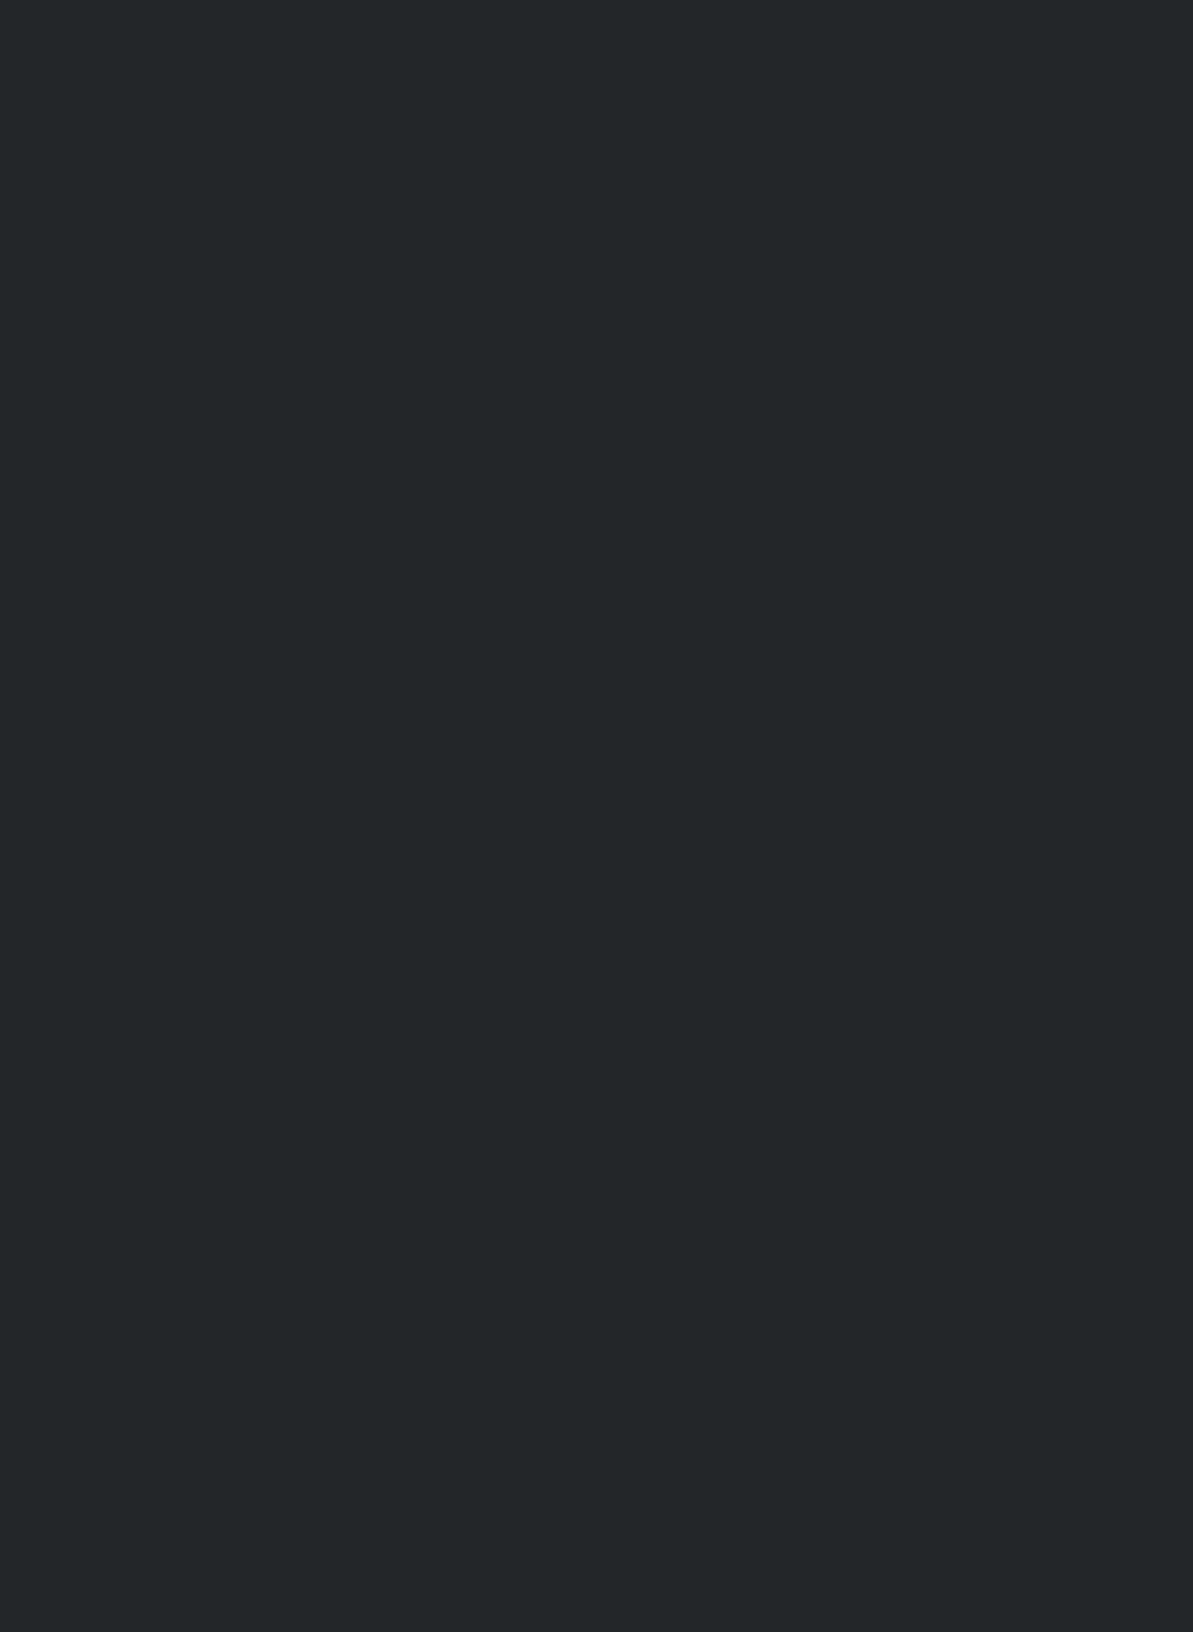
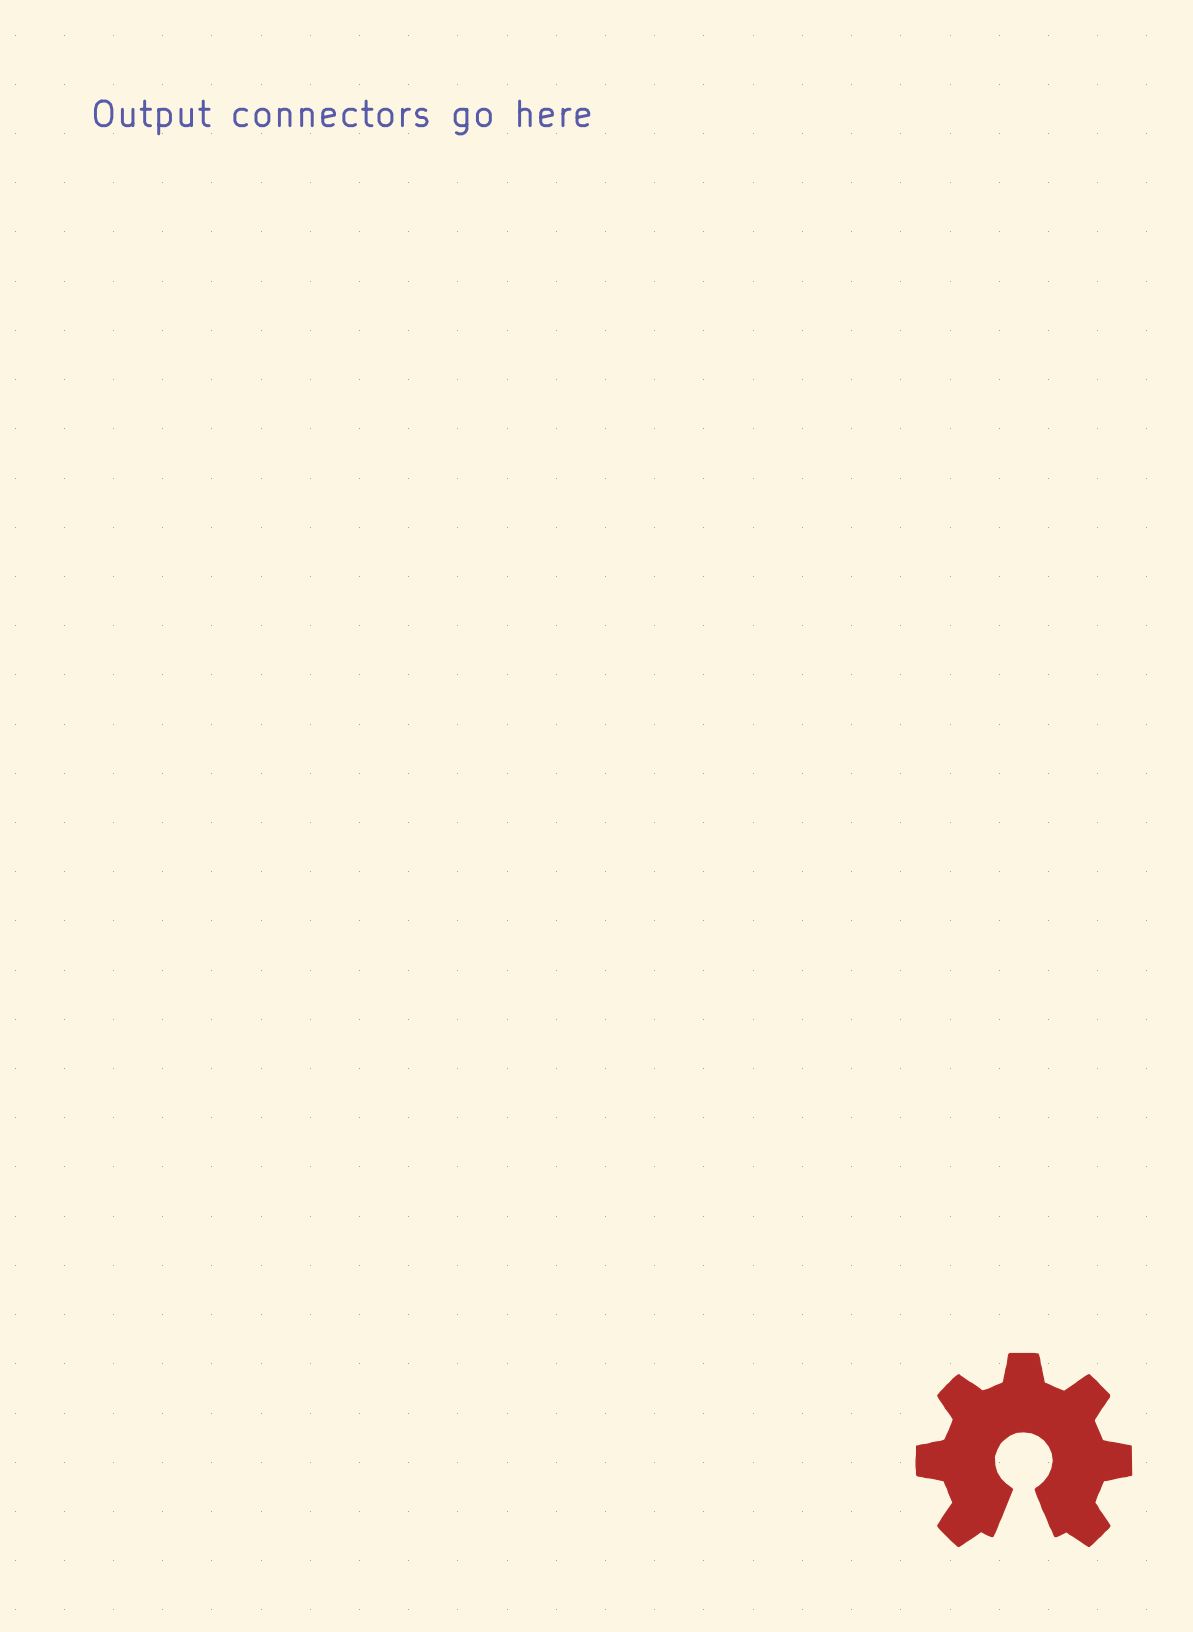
text: none -> Output connectors go here (342, 117)
part: none -> (1023, 1449)

